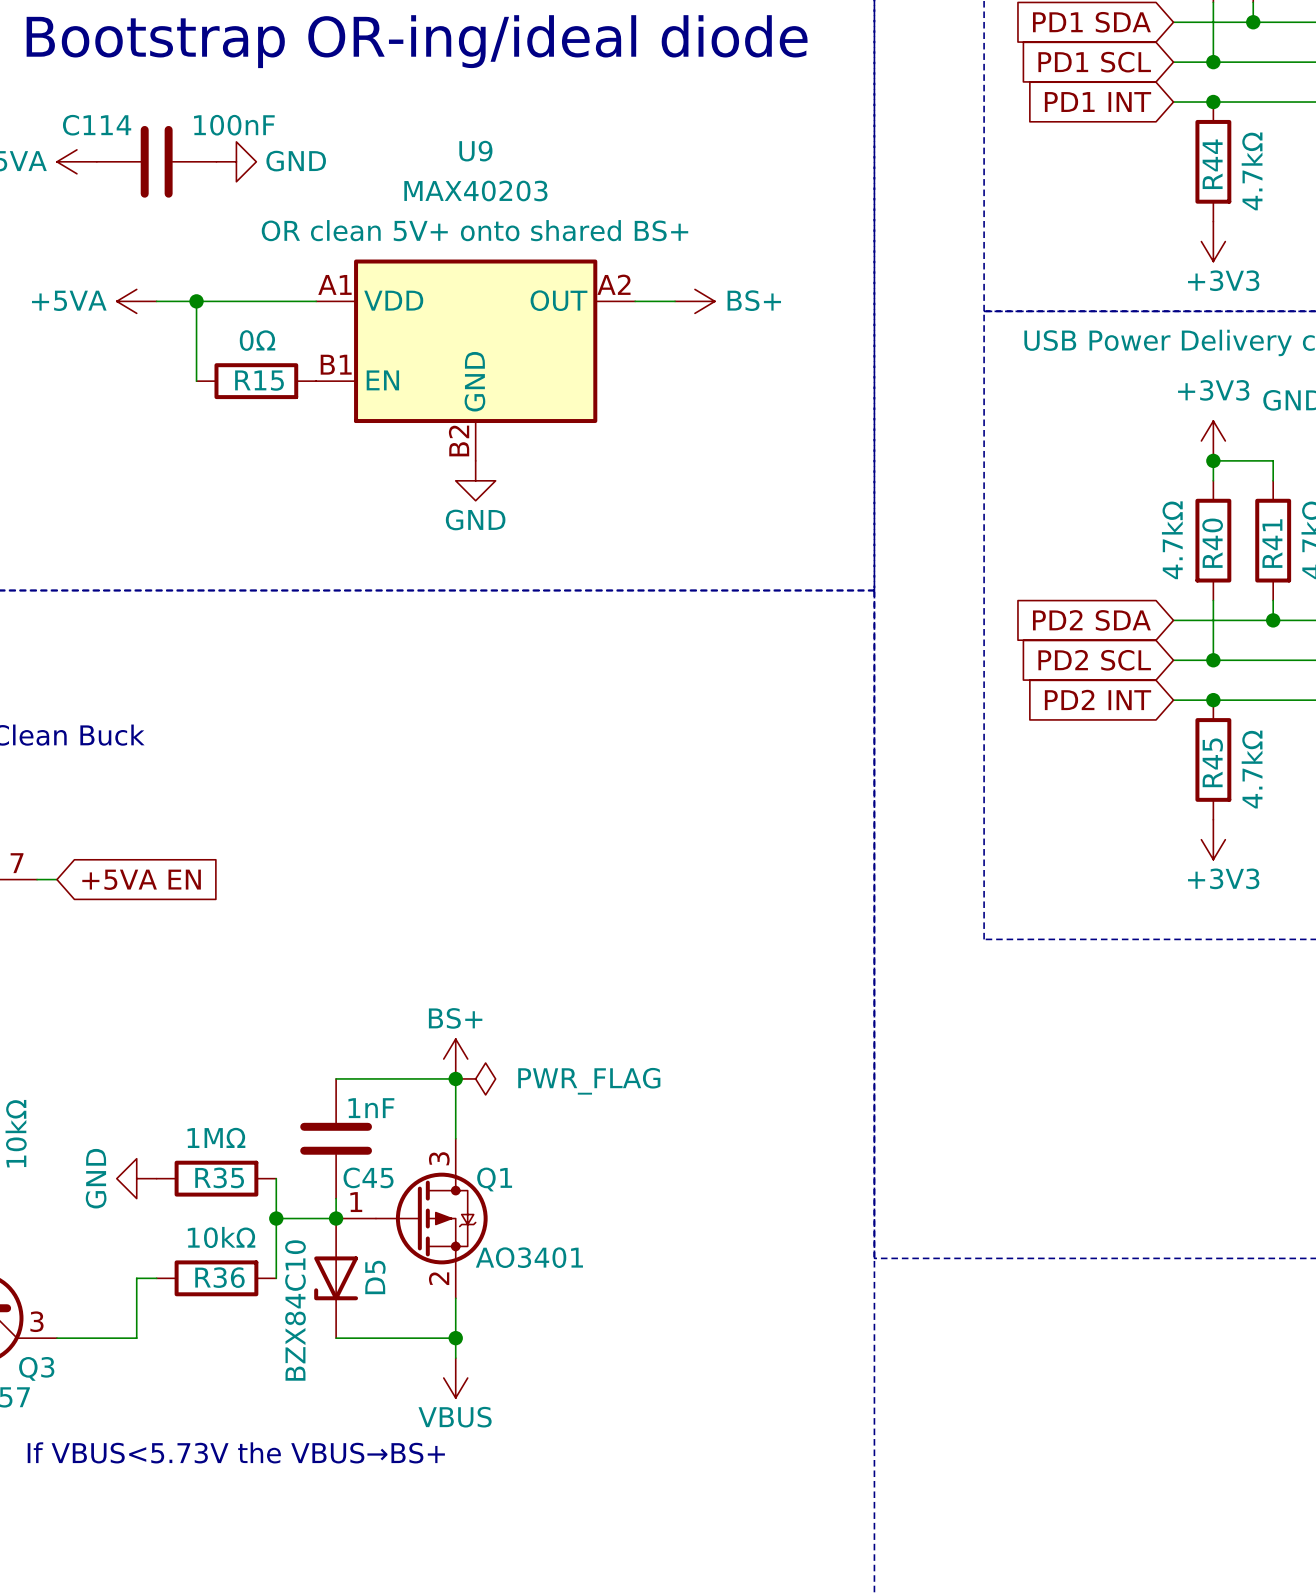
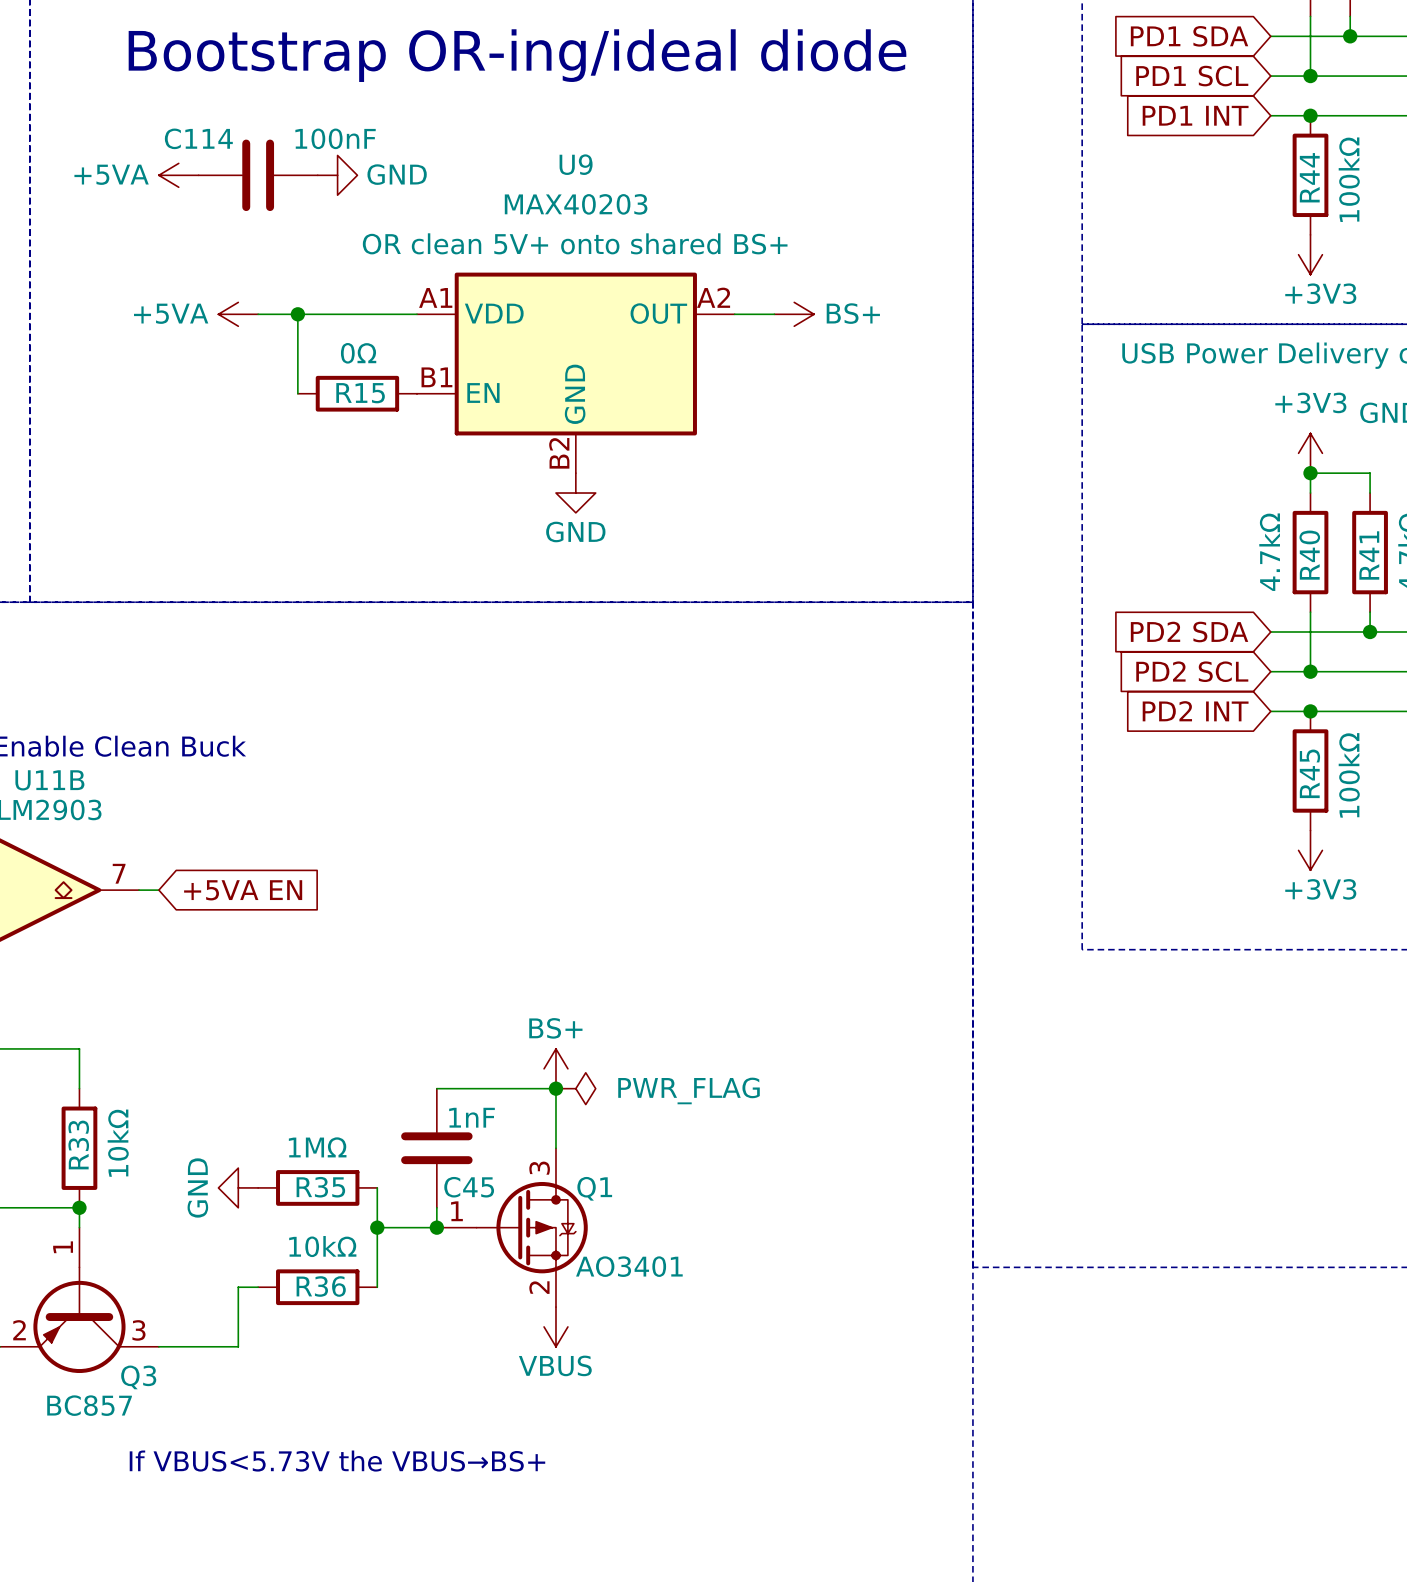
R44 value: 4.7kΩ (1252, 171) -> 100kΩ (1349, 179)
R45 value: 4.7kΩ (1252, 769) -> 100kΩ (1349, 775)
D5: BZX84C10 (336, 1278) -> none
wire: (336, 1338) (455, 1338) -> none
junction: (455, 1338) -> none
power symbol position: VBUS (455, 1378) -> VBUS (555, 1326)

